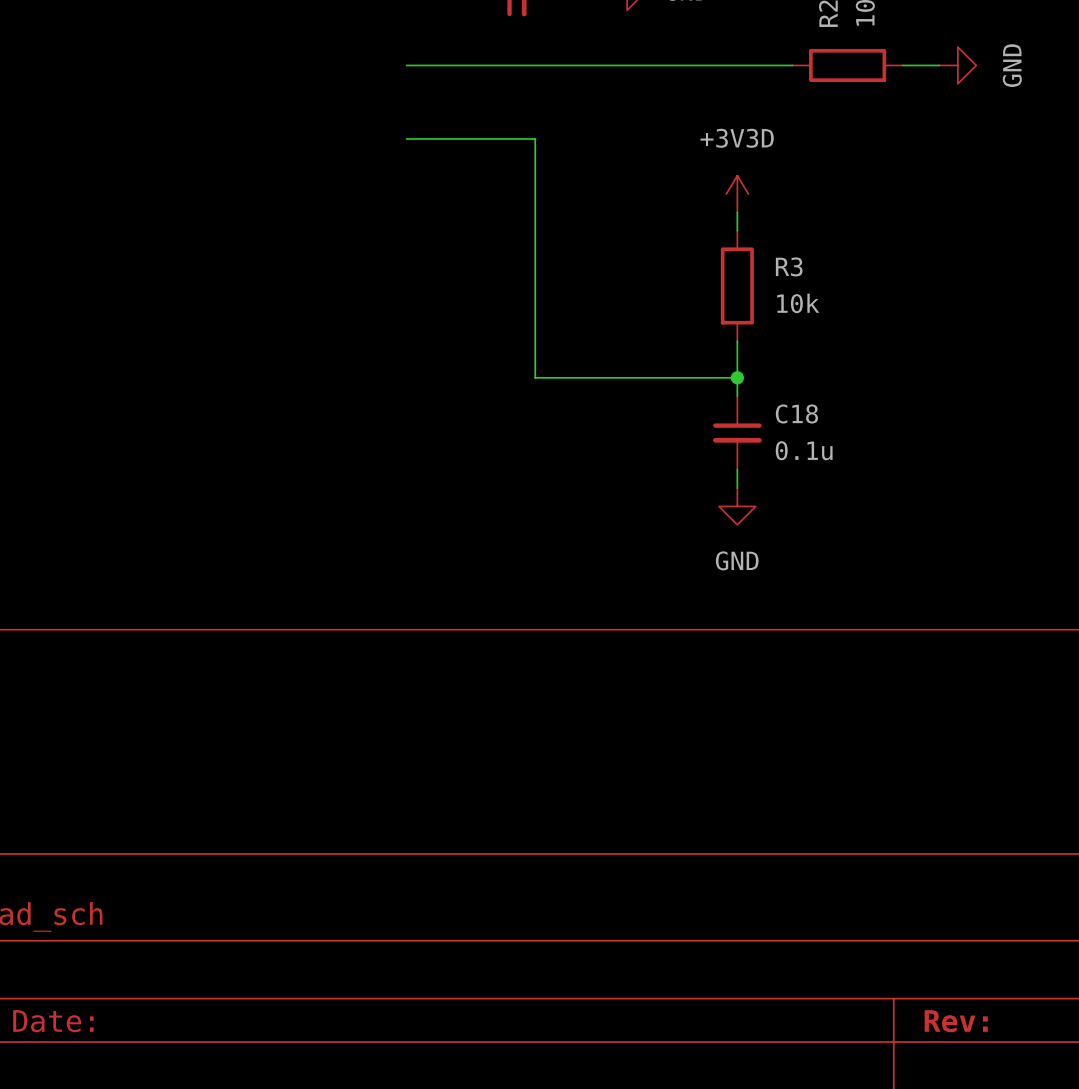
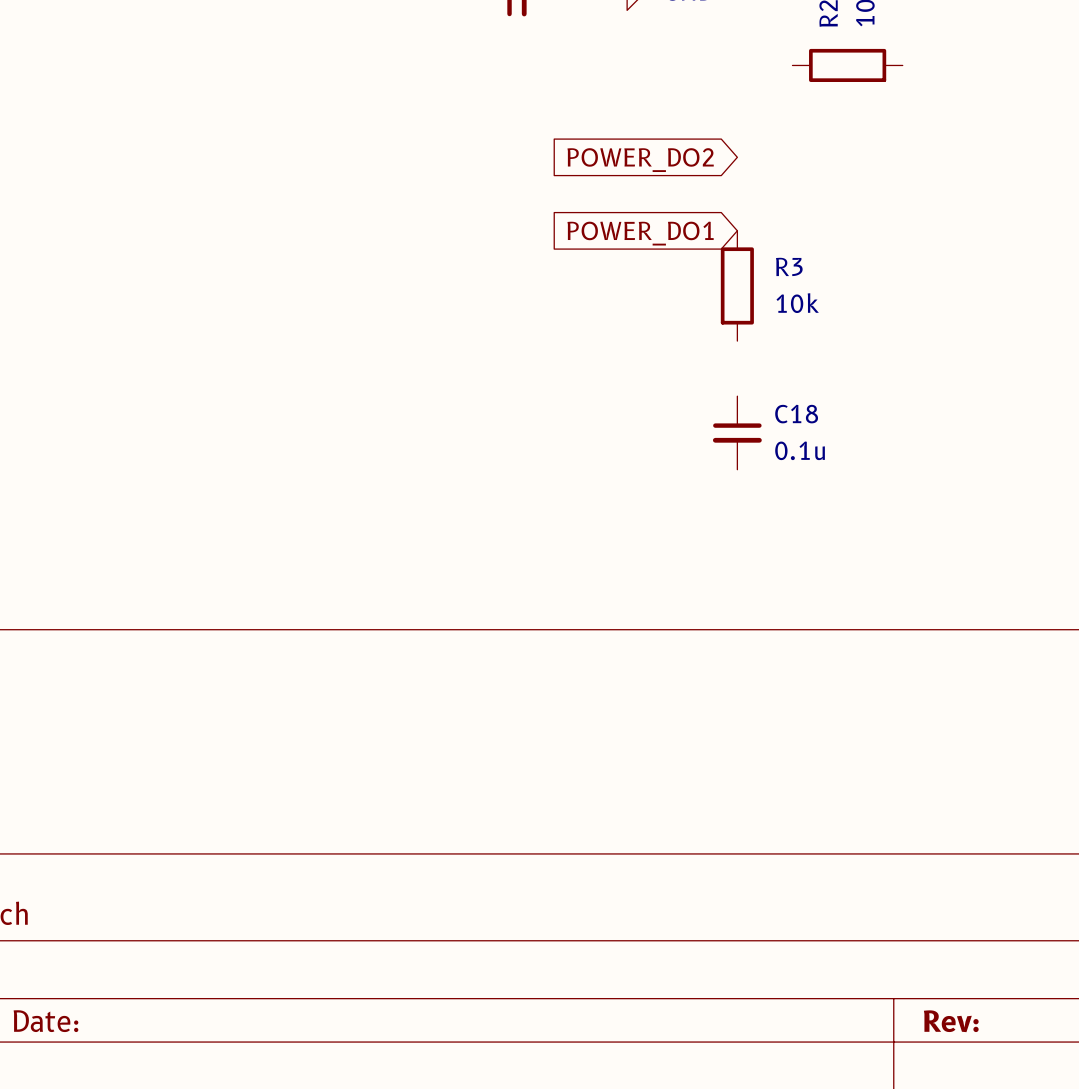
wire: (406, 65) (792, 65) -> none
wire: (902, 65) (939, 65) -> none
power symbol: GND (957, 65) -> none
wire: (406, 138) (535, 138) (535, 377) (737, 377) -> none
global label: none -> POWER_DO2 (640, 160)
power symbol: +3V3D (737, 194) -> none
wire: (737, 212) (737, 230) -> none
global label: none -> POWER_DO1 (640, 233)
wire: (737, 341) (737, 396) -> none
junction: (737, 377) -> none
wire: (737, 469) (737, 488) -> none
power symbol: GND (737, 506) -> none

